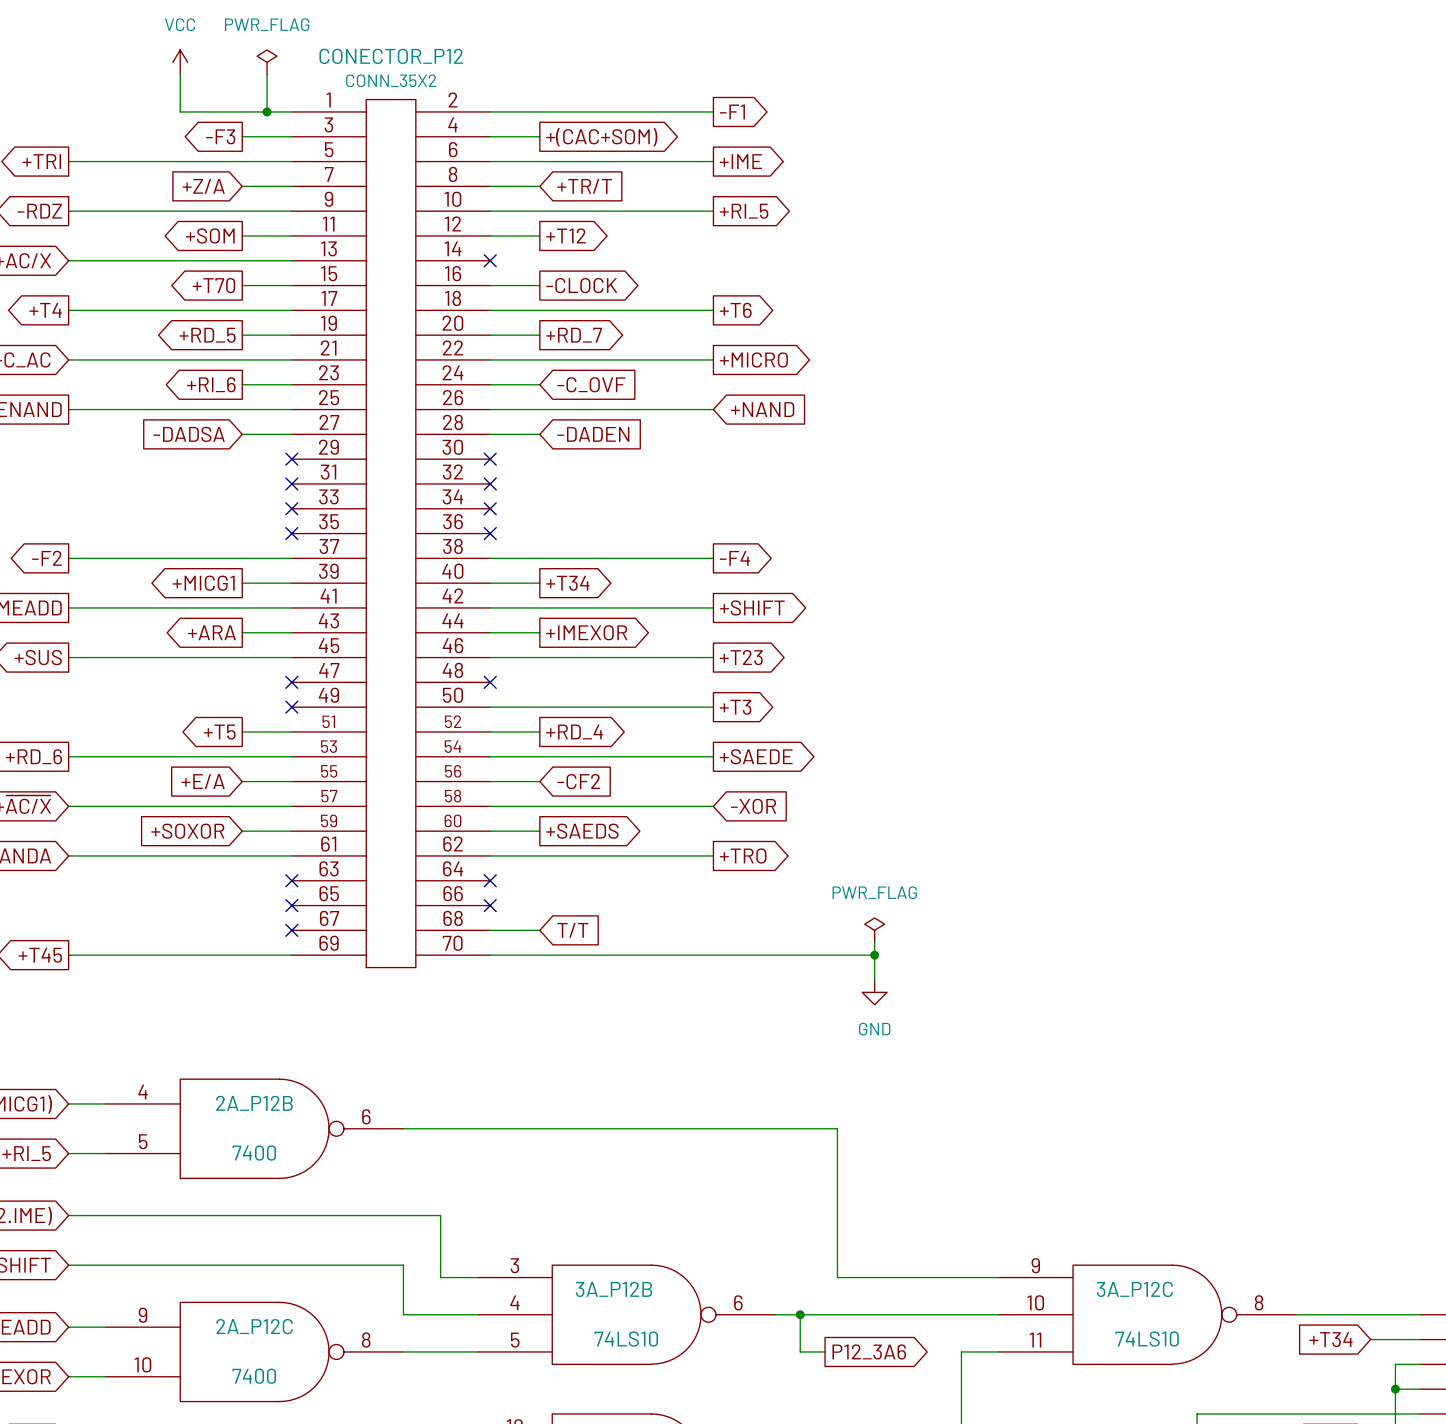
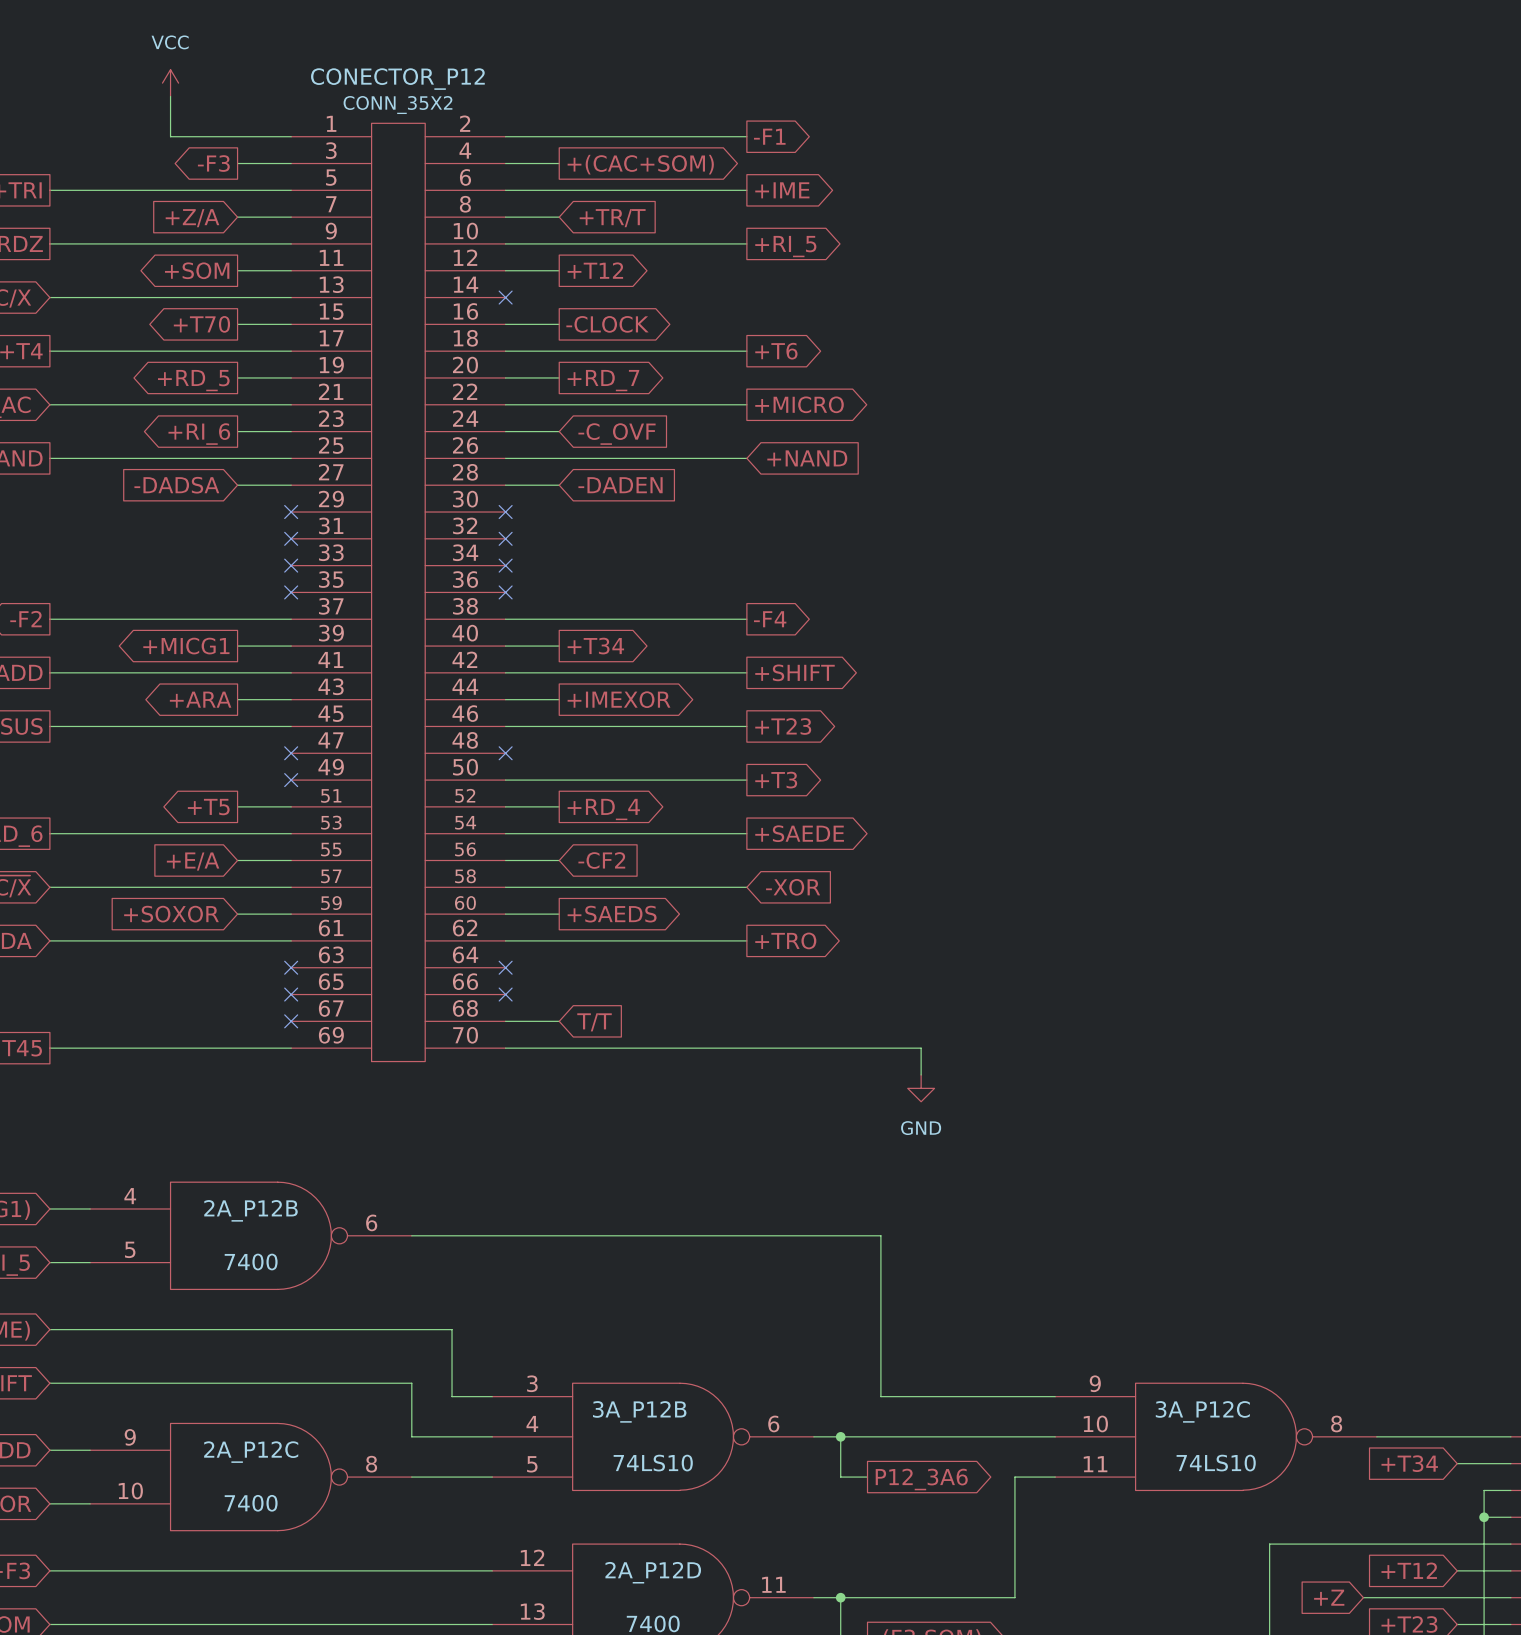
power symbol: PWR_FLAG (267, 62) -> none
wire: (267, 74) (267, 111) -> none
junction: (267, 111) -> none
power symbol: PWR_FLAG (874, 930) -> none
wire: (874, 942) (874, 955) -> none
junction: (874, 955) -> none

